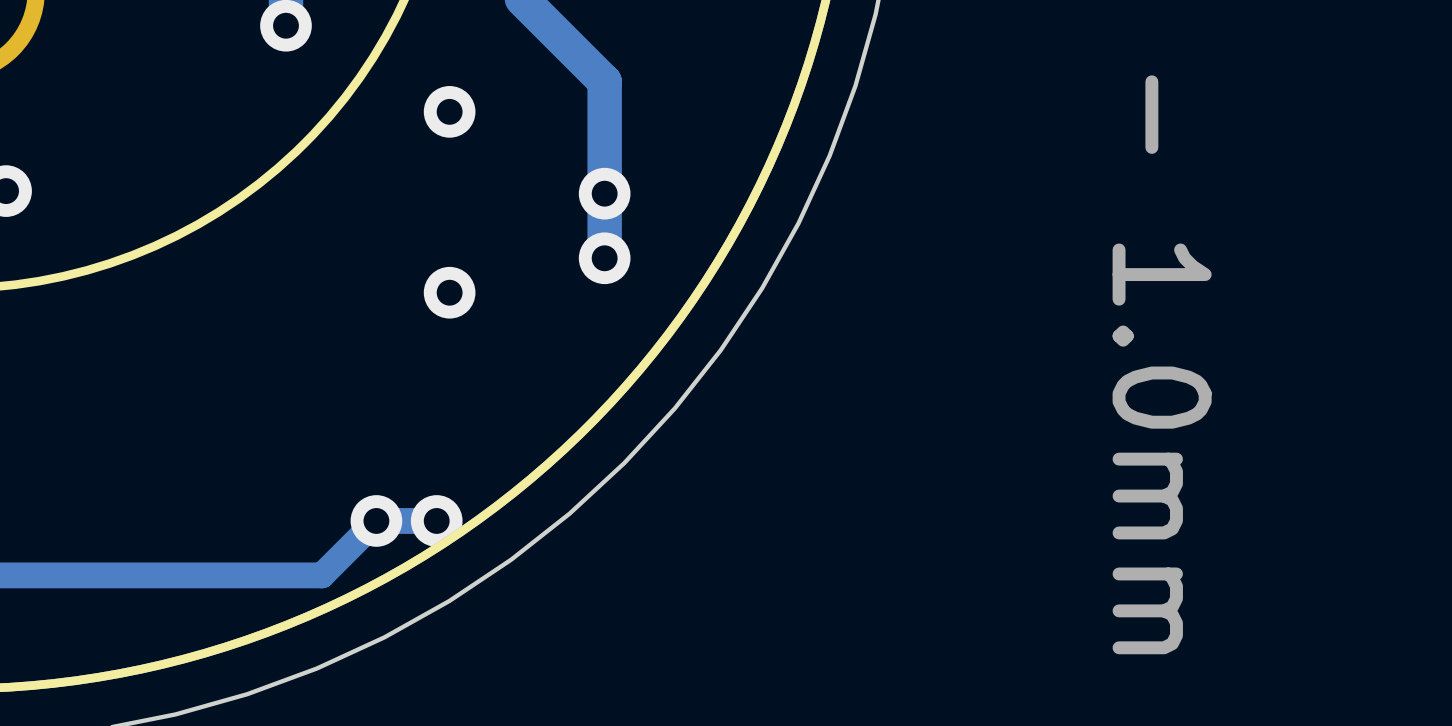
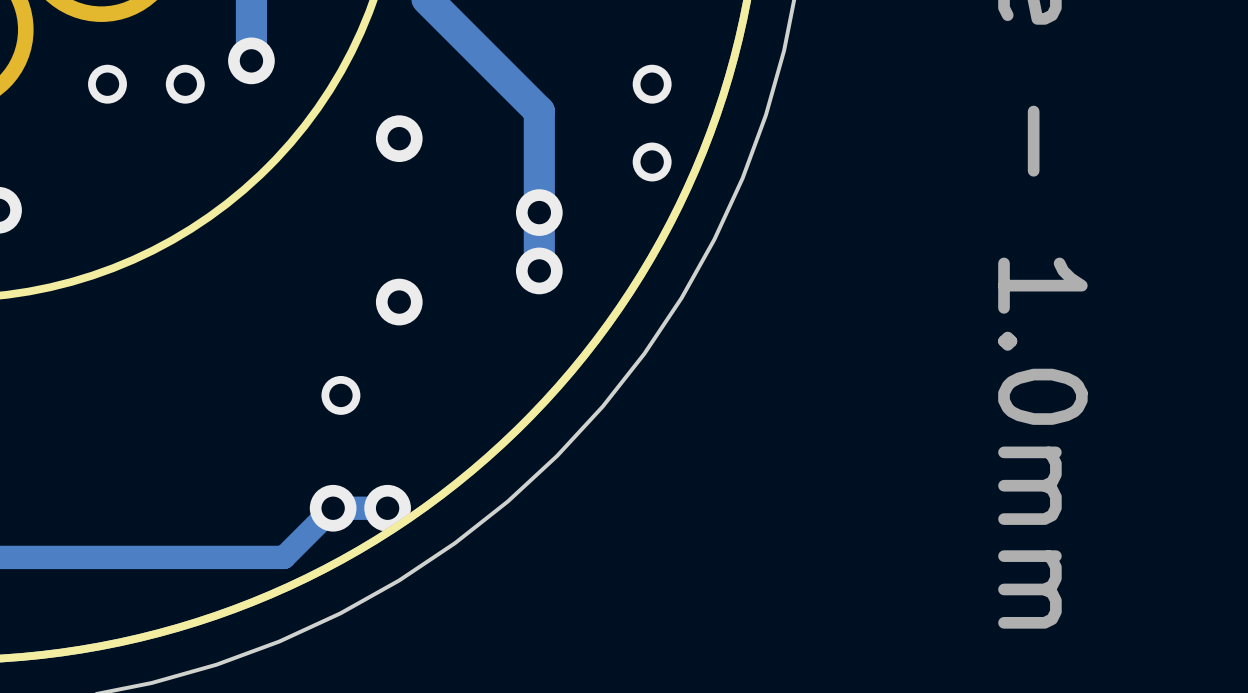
via: none -> (107, 84)
via: none -> (185, 84)
via: none -> (652, 84)
via: none -> (652, 162)
via: none -> (340, 395)

